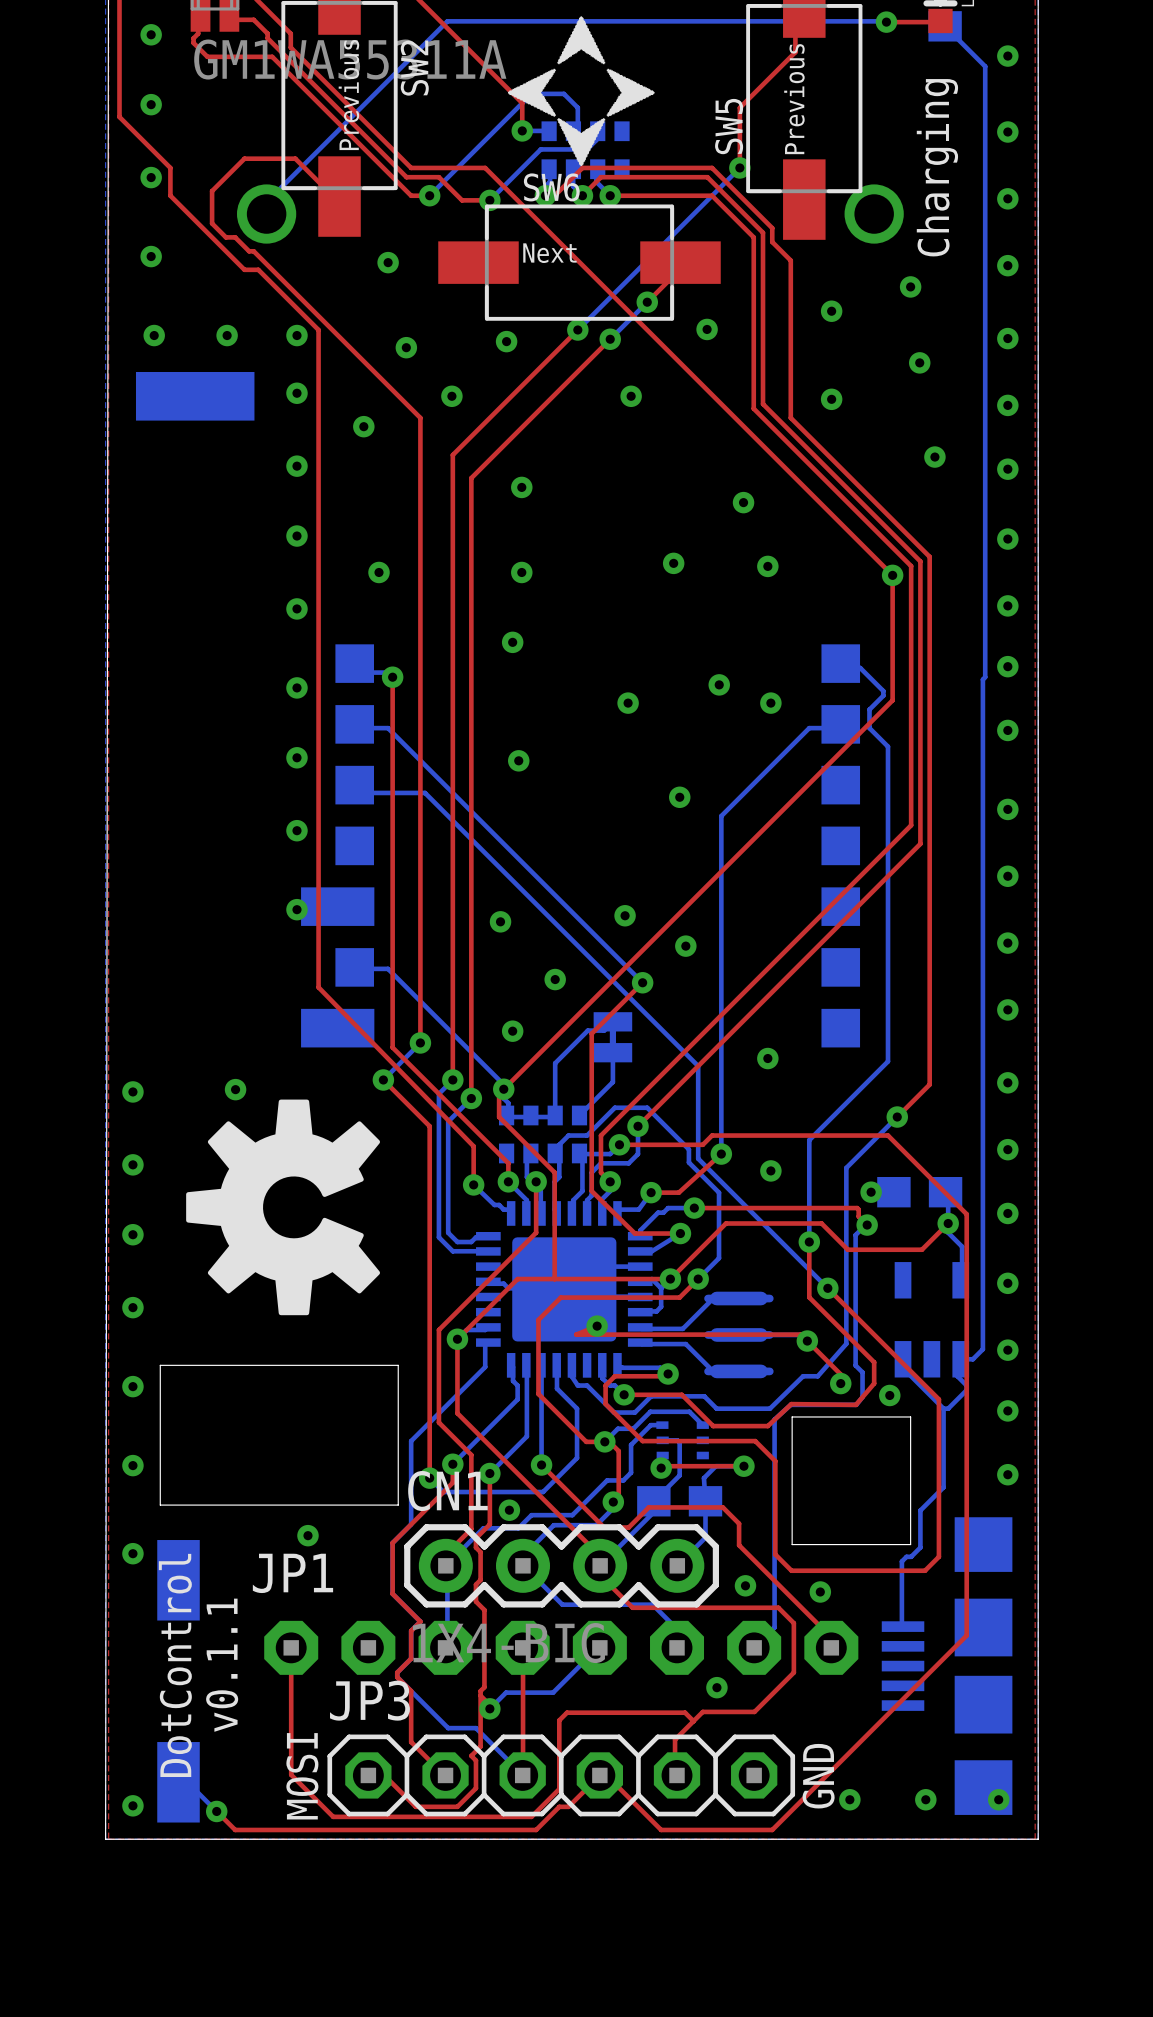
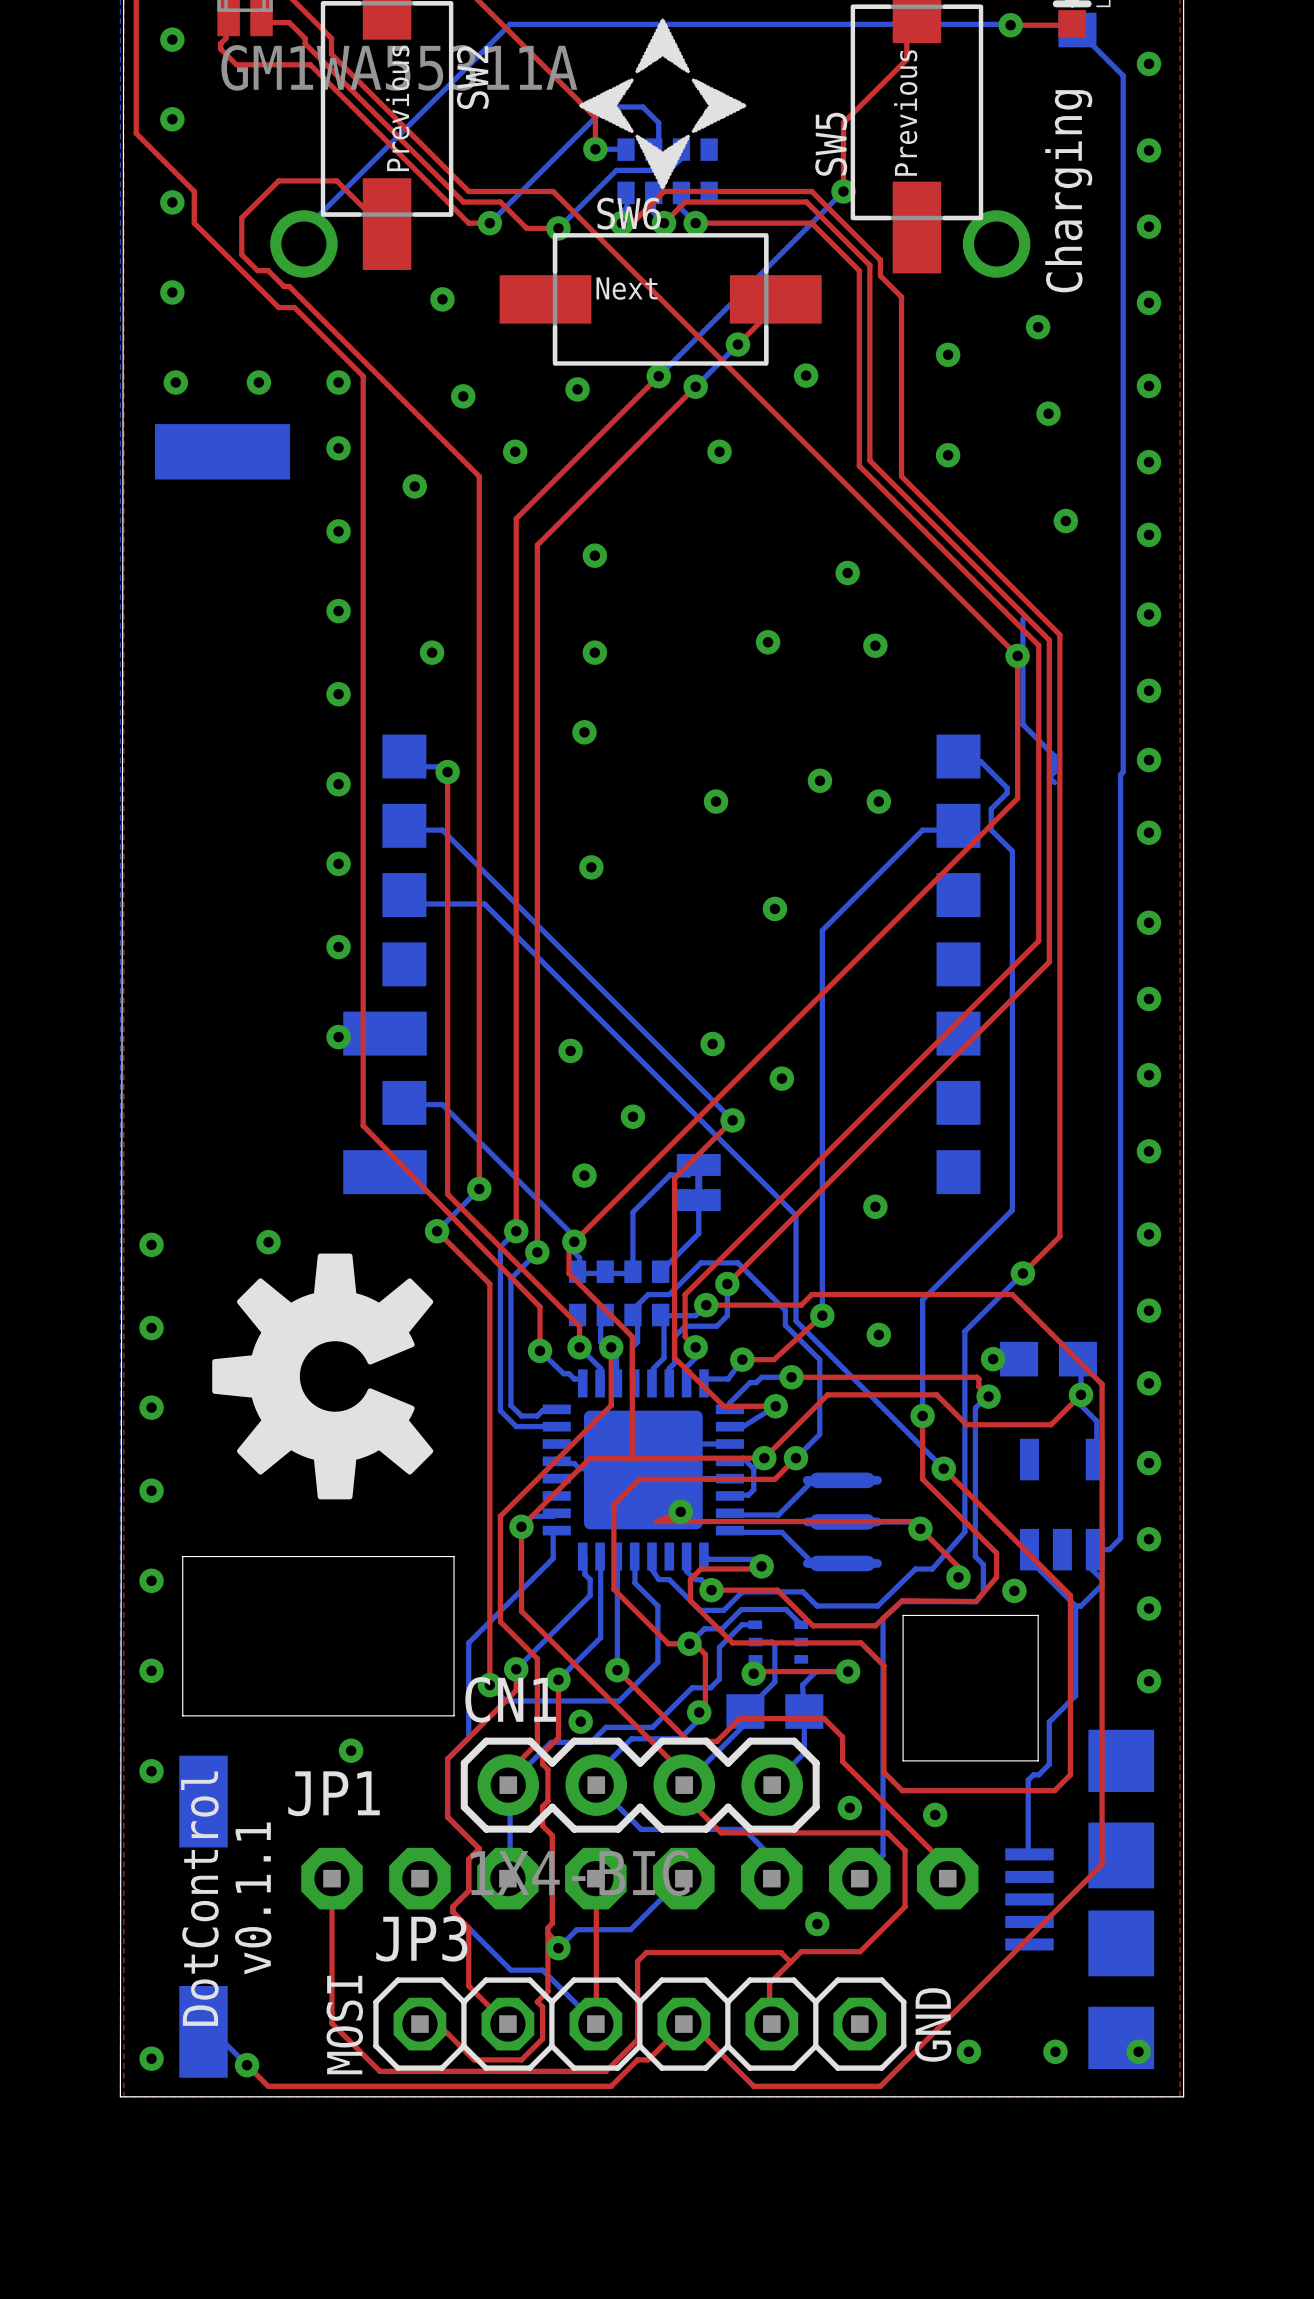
bottom track: none -> (1022, 618) (1022, 724) (1054, 756) (1054, 772) (1049, 777) (1054, 782)

